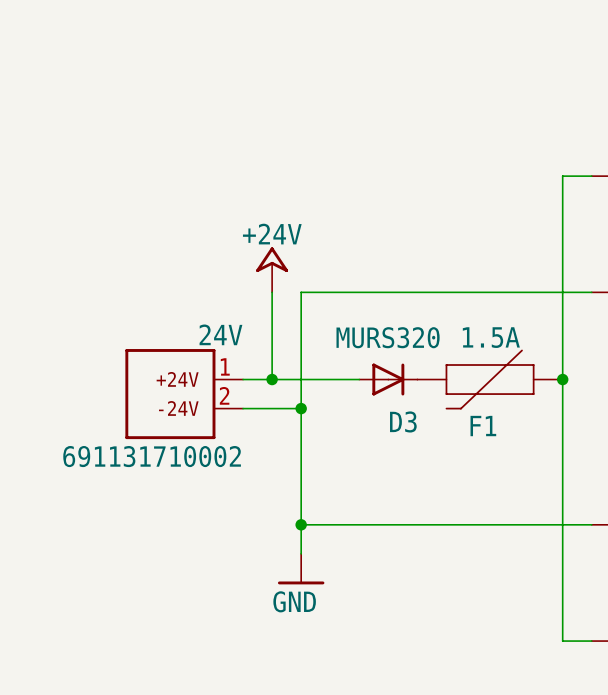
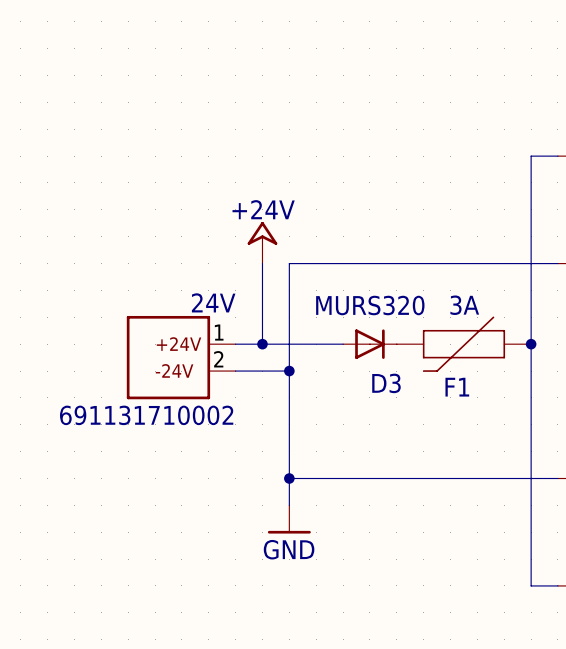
F1 value: 1.5A (491, 337) -> 3A (464, 305)

